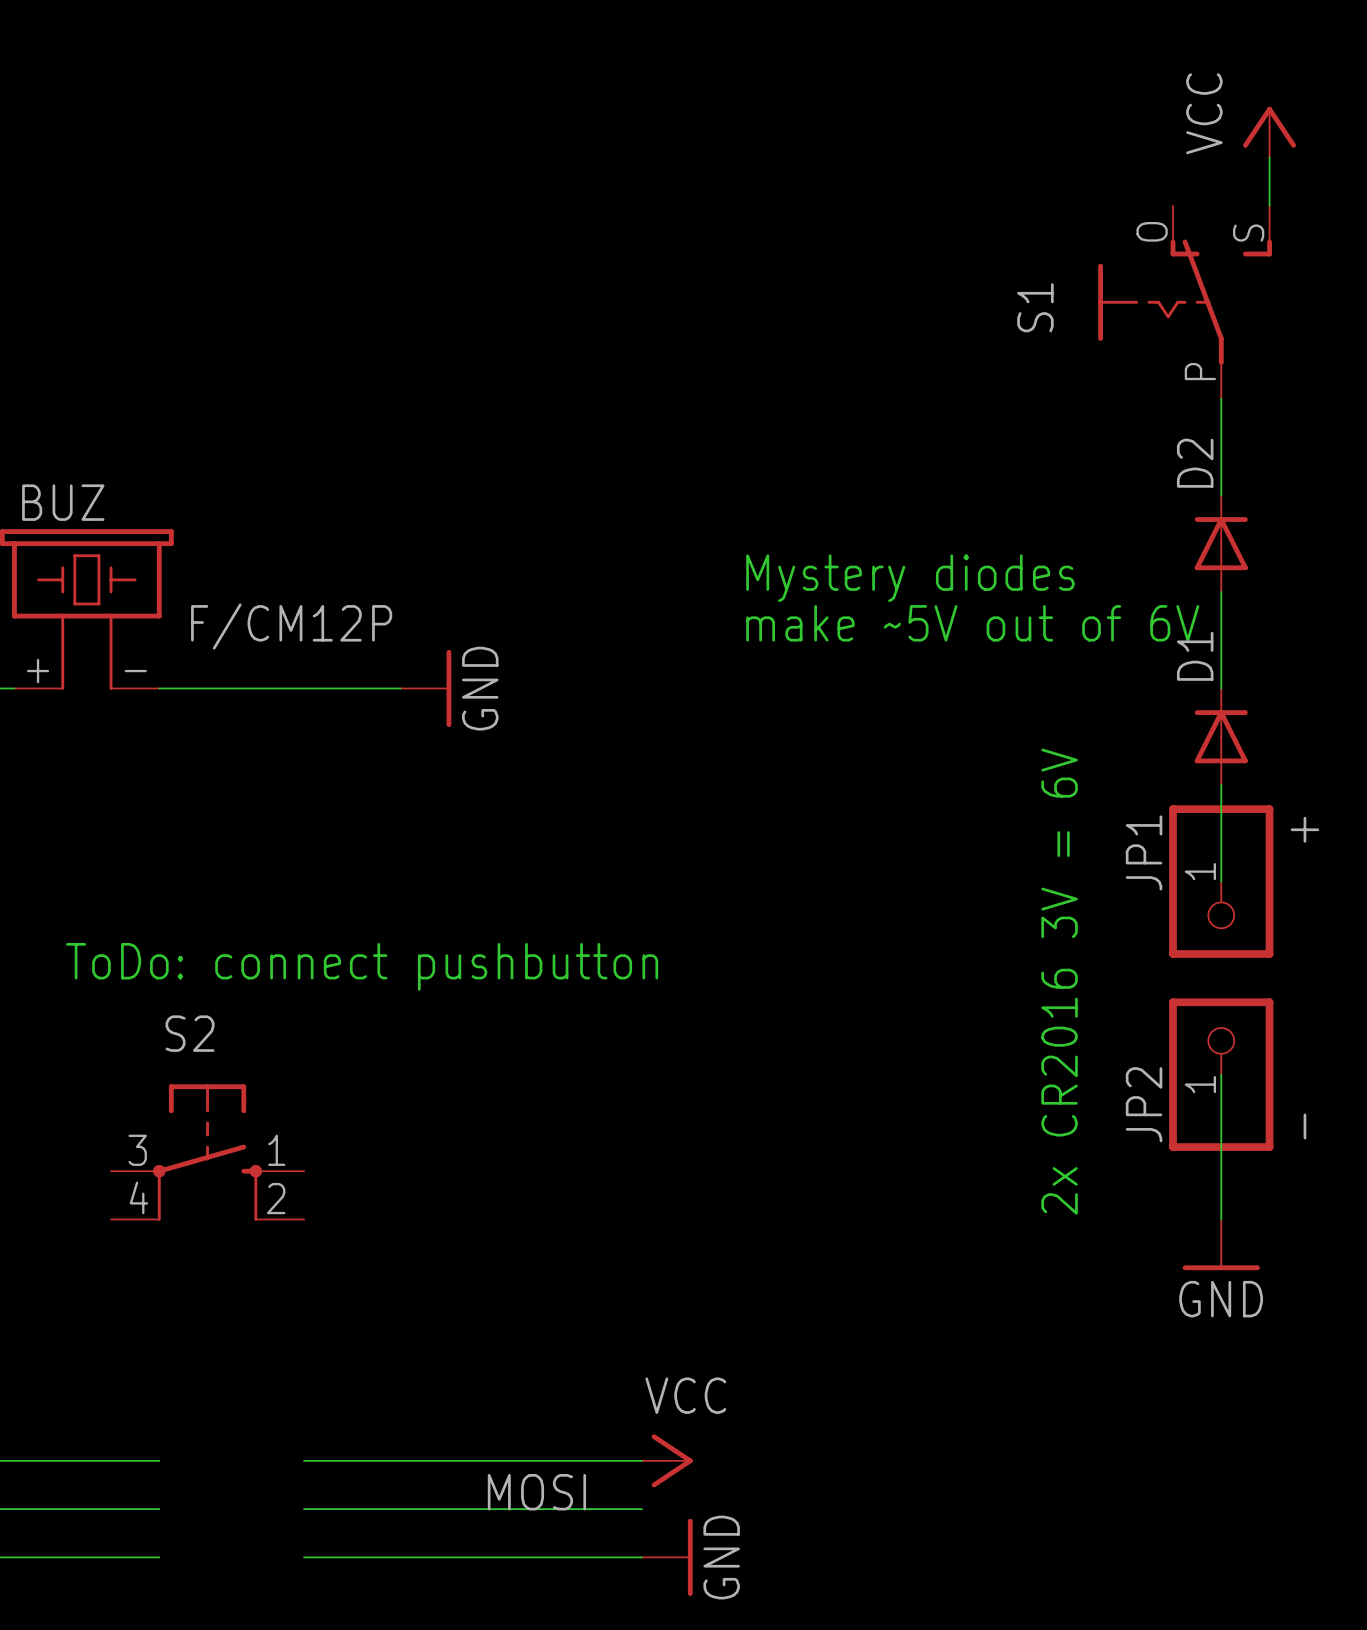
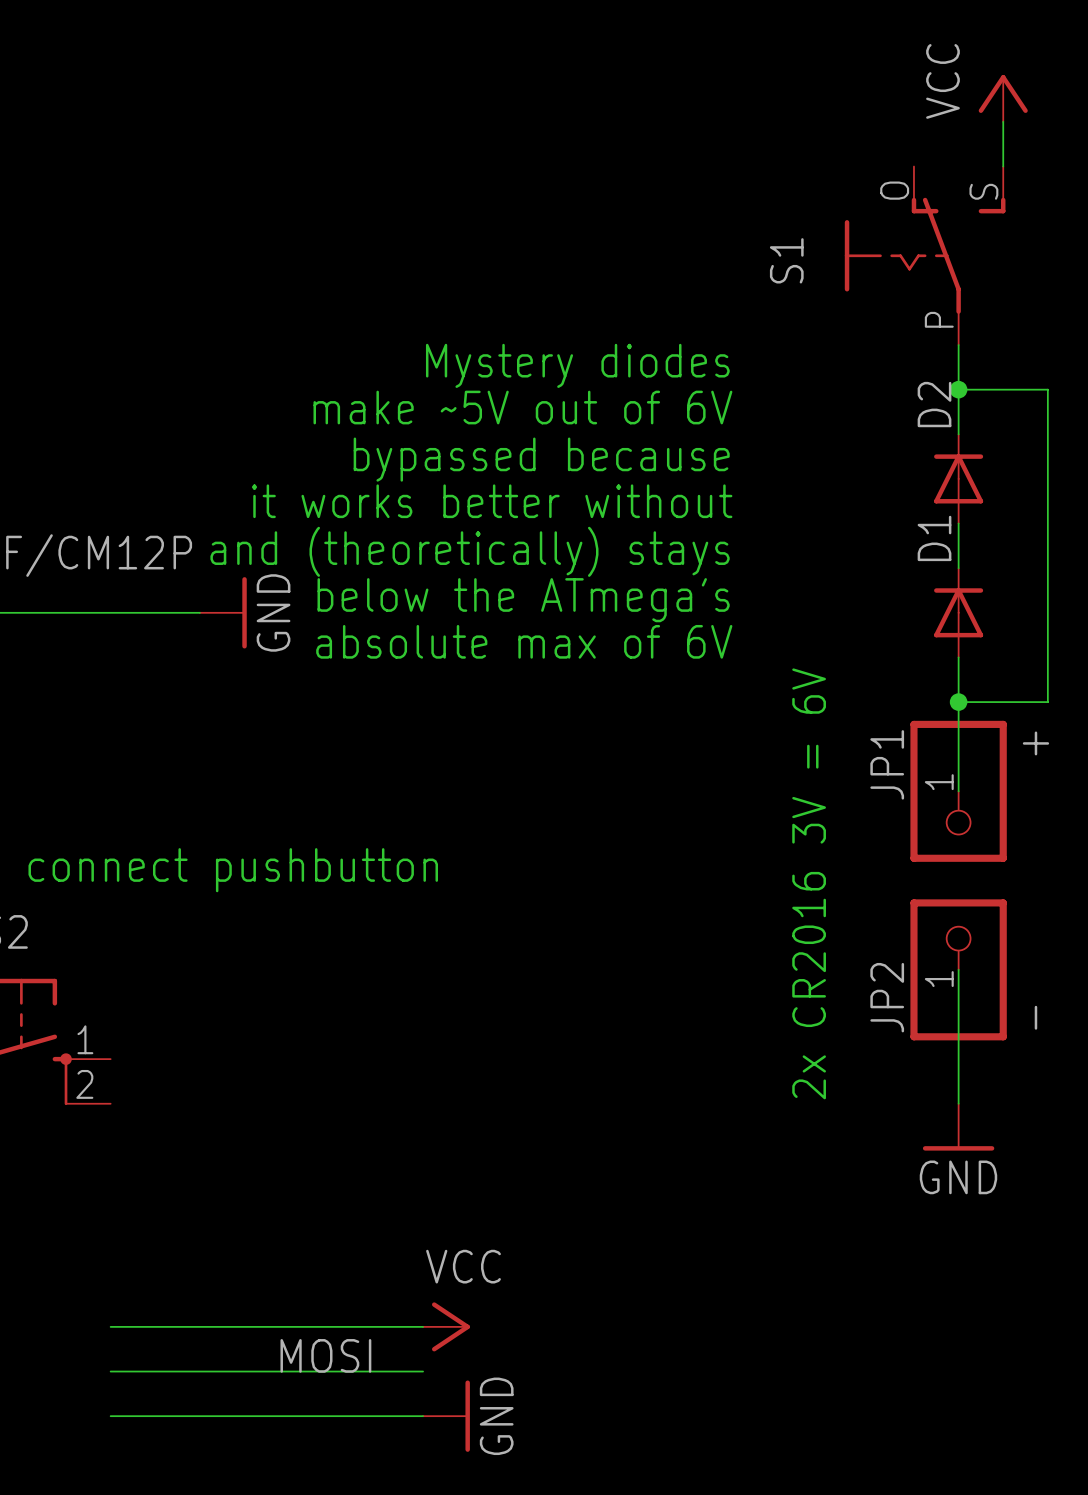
wire: none -> (958, 389) (1047, 389) (1047, 702) (958, 702) (958, 657)
junction: none -> (958, 389)
text: none -> bypassed because (541, 459)
text: none -> it works better without (492, 501)
text position: Mystery diodes (910, 578) -> Mystery diodes (577, 365)
text: none -> and (theoretically) stays (470, 551)
text position: make ~5V out of 6V (972, 623) -> make ~5V out of 6V (522, 407)
text: none -> below the ATmega's (523, 600)
text: none -> absolute max of 6V (524, 641)
D1 position: (1221, 736) -> (958, 612)
junction: none -> (958, 702)

